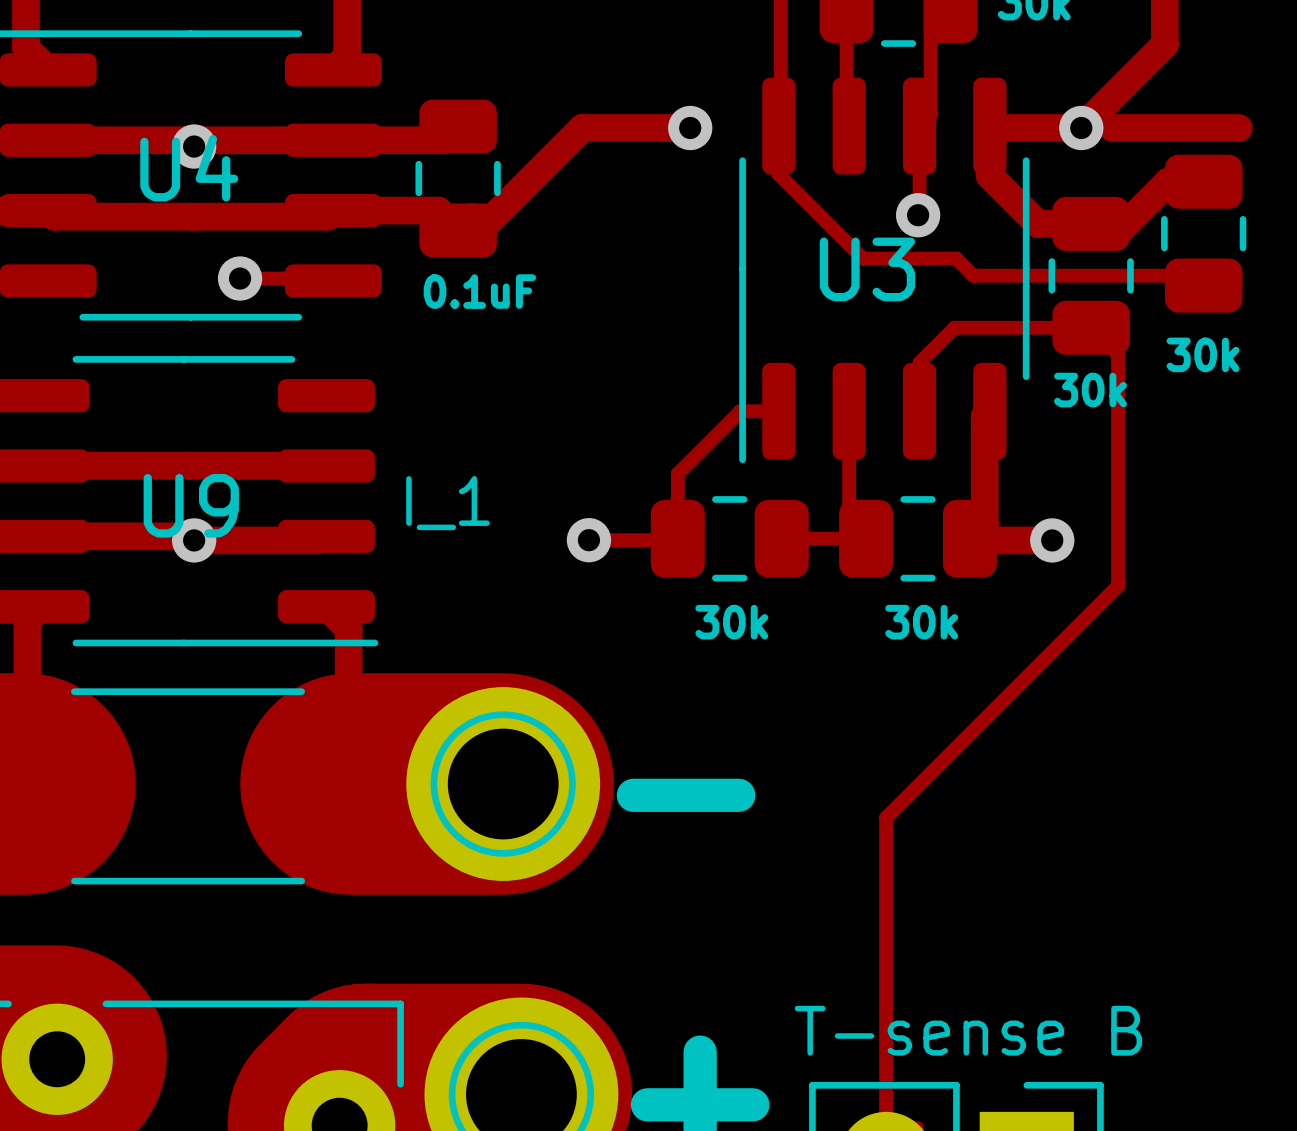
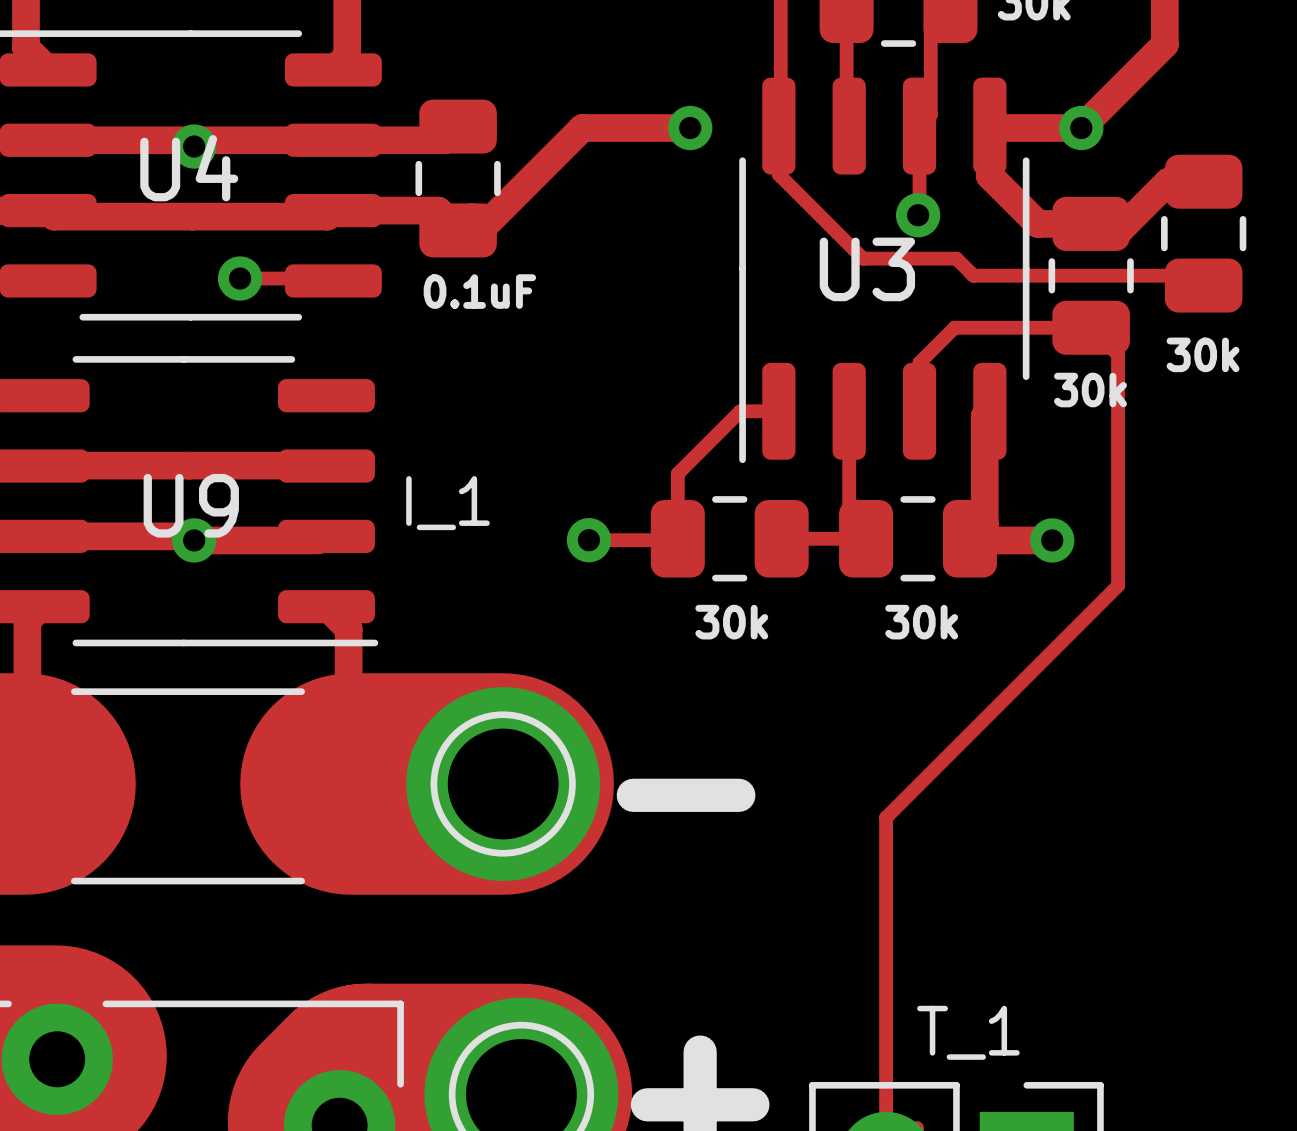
track: (1112, 128) (1238, 128) -> none
text: T-sense B (968, 1030) -> T_1 (968, 1032)

